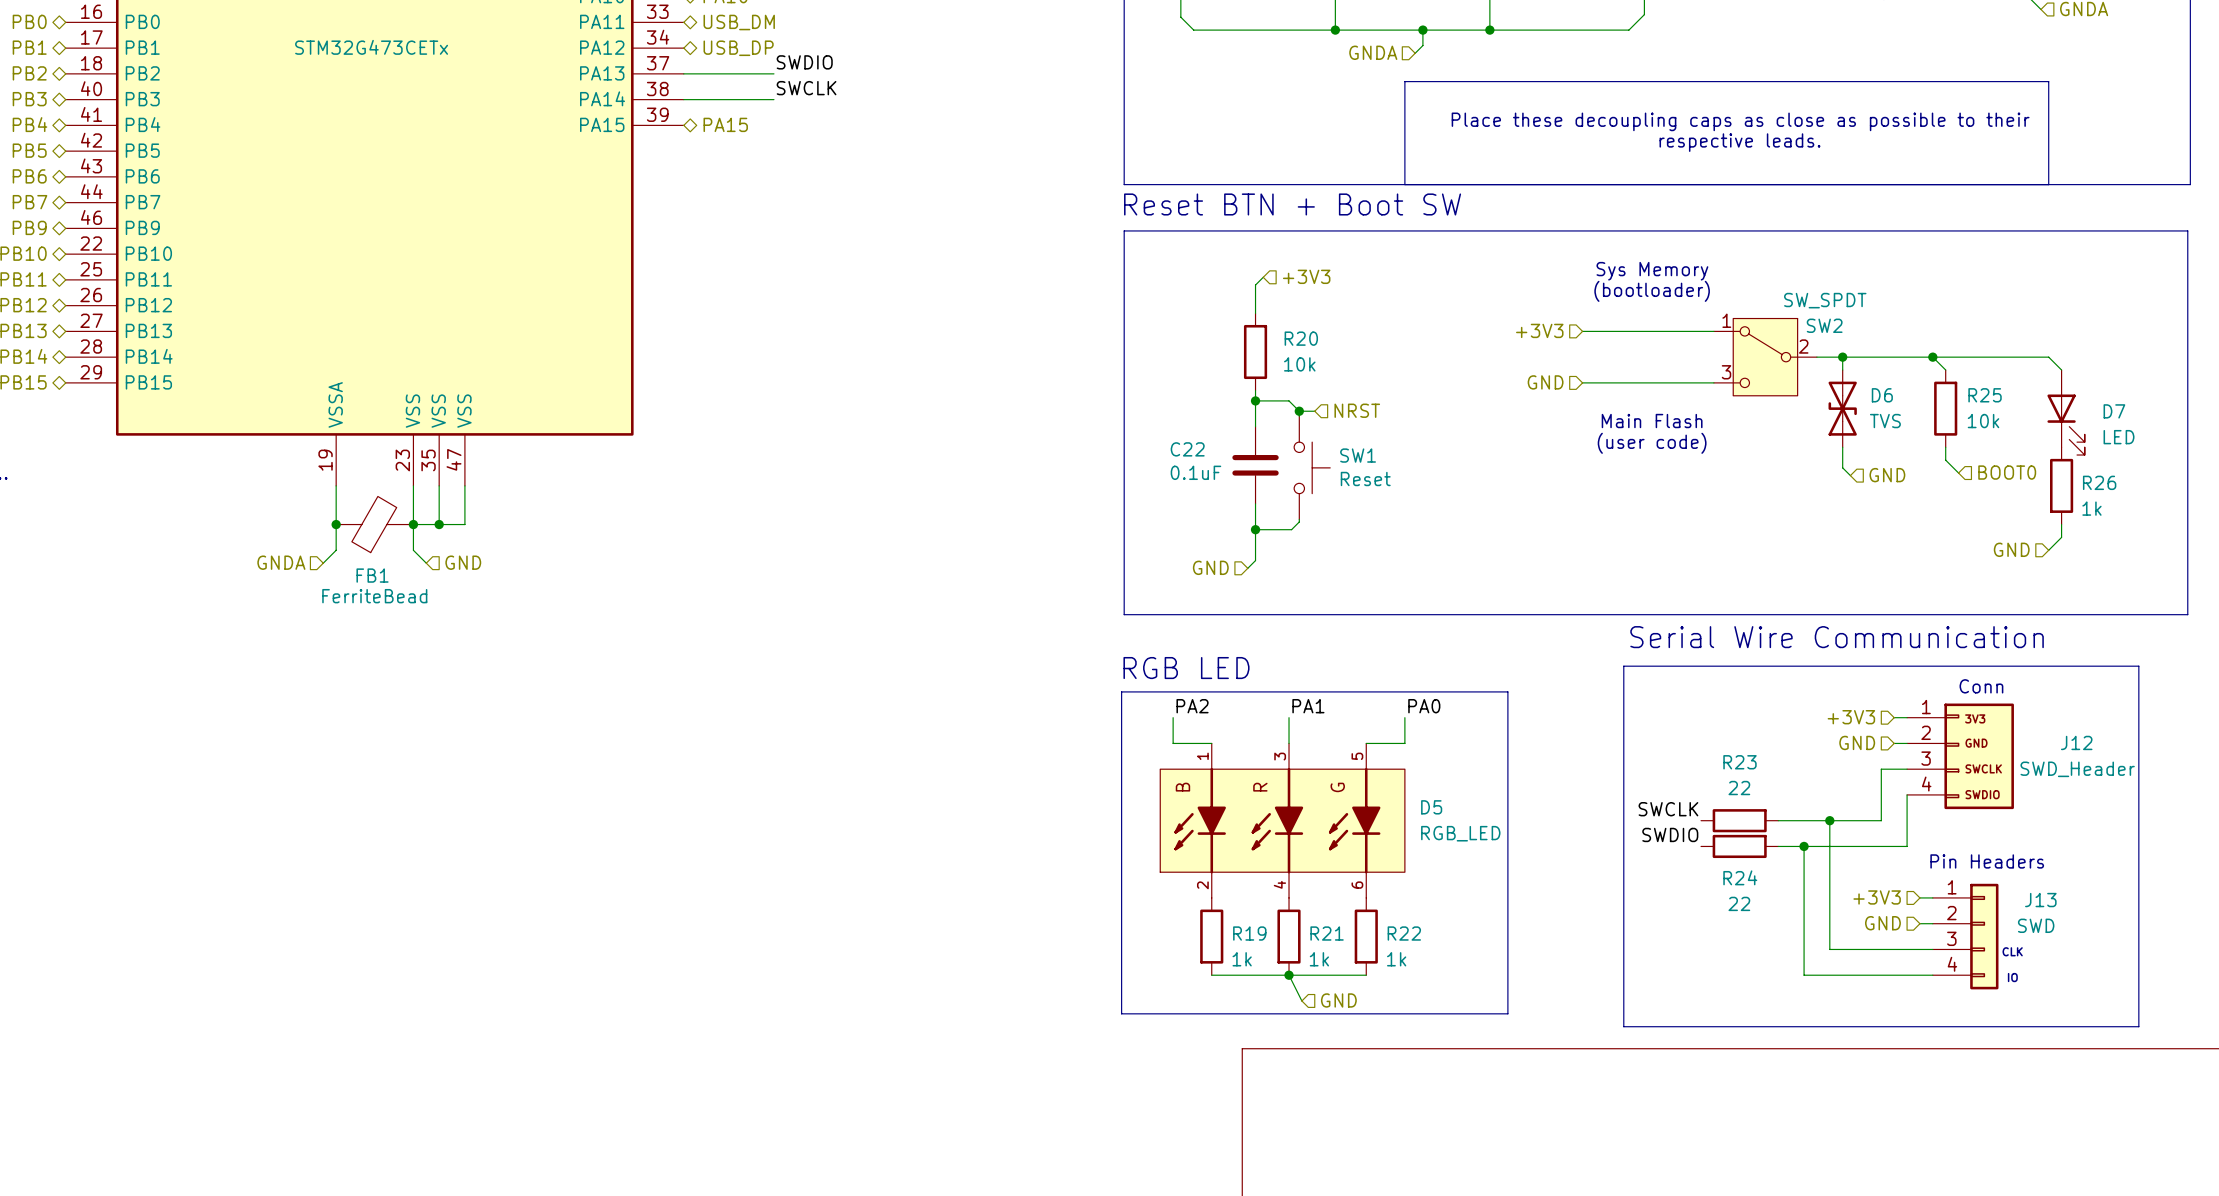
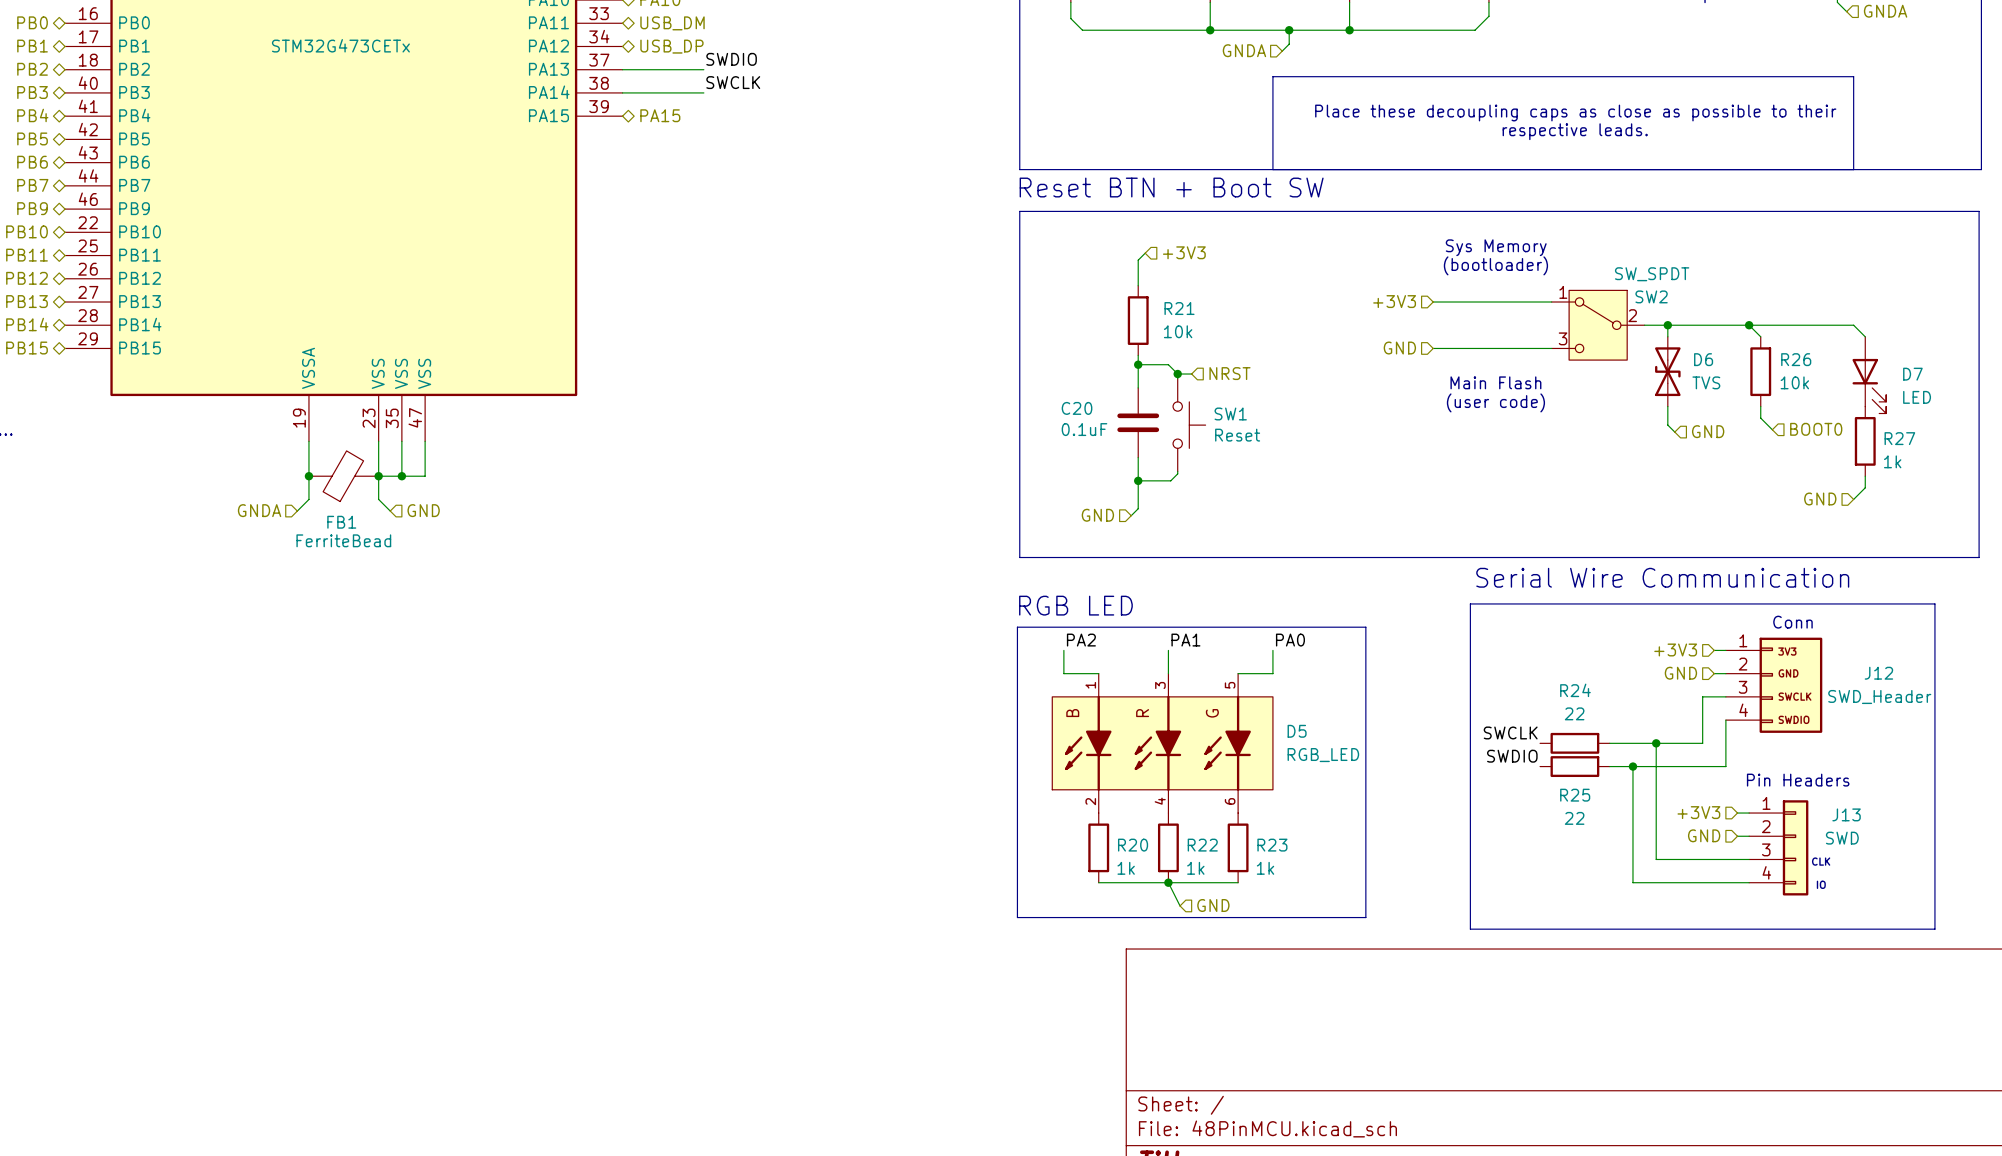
R20 name: R20 (1301, 338) -> R21 (1179, 308)
R25 name: R25 (1985, 395) -> R26 (1796, 359)
C22 name: C22 (1187, 449) -> C20 (1077, 408)
R26 name: R26 (2099, 482) -> R27 (1899, 438)
R23 name: R23 (1739, 762) -> R24 (1575, 690)
R24 name: R24 (1740, 877) -> R25 (1575, 795)
R19 name: R19 (1249, 933) -> R20 (1133, 845)
R21 name: R21 (1327, 933) -> R22 (1202, 845)
R22 name: R22 (1404, 933) -> R23 (1272, 845)

